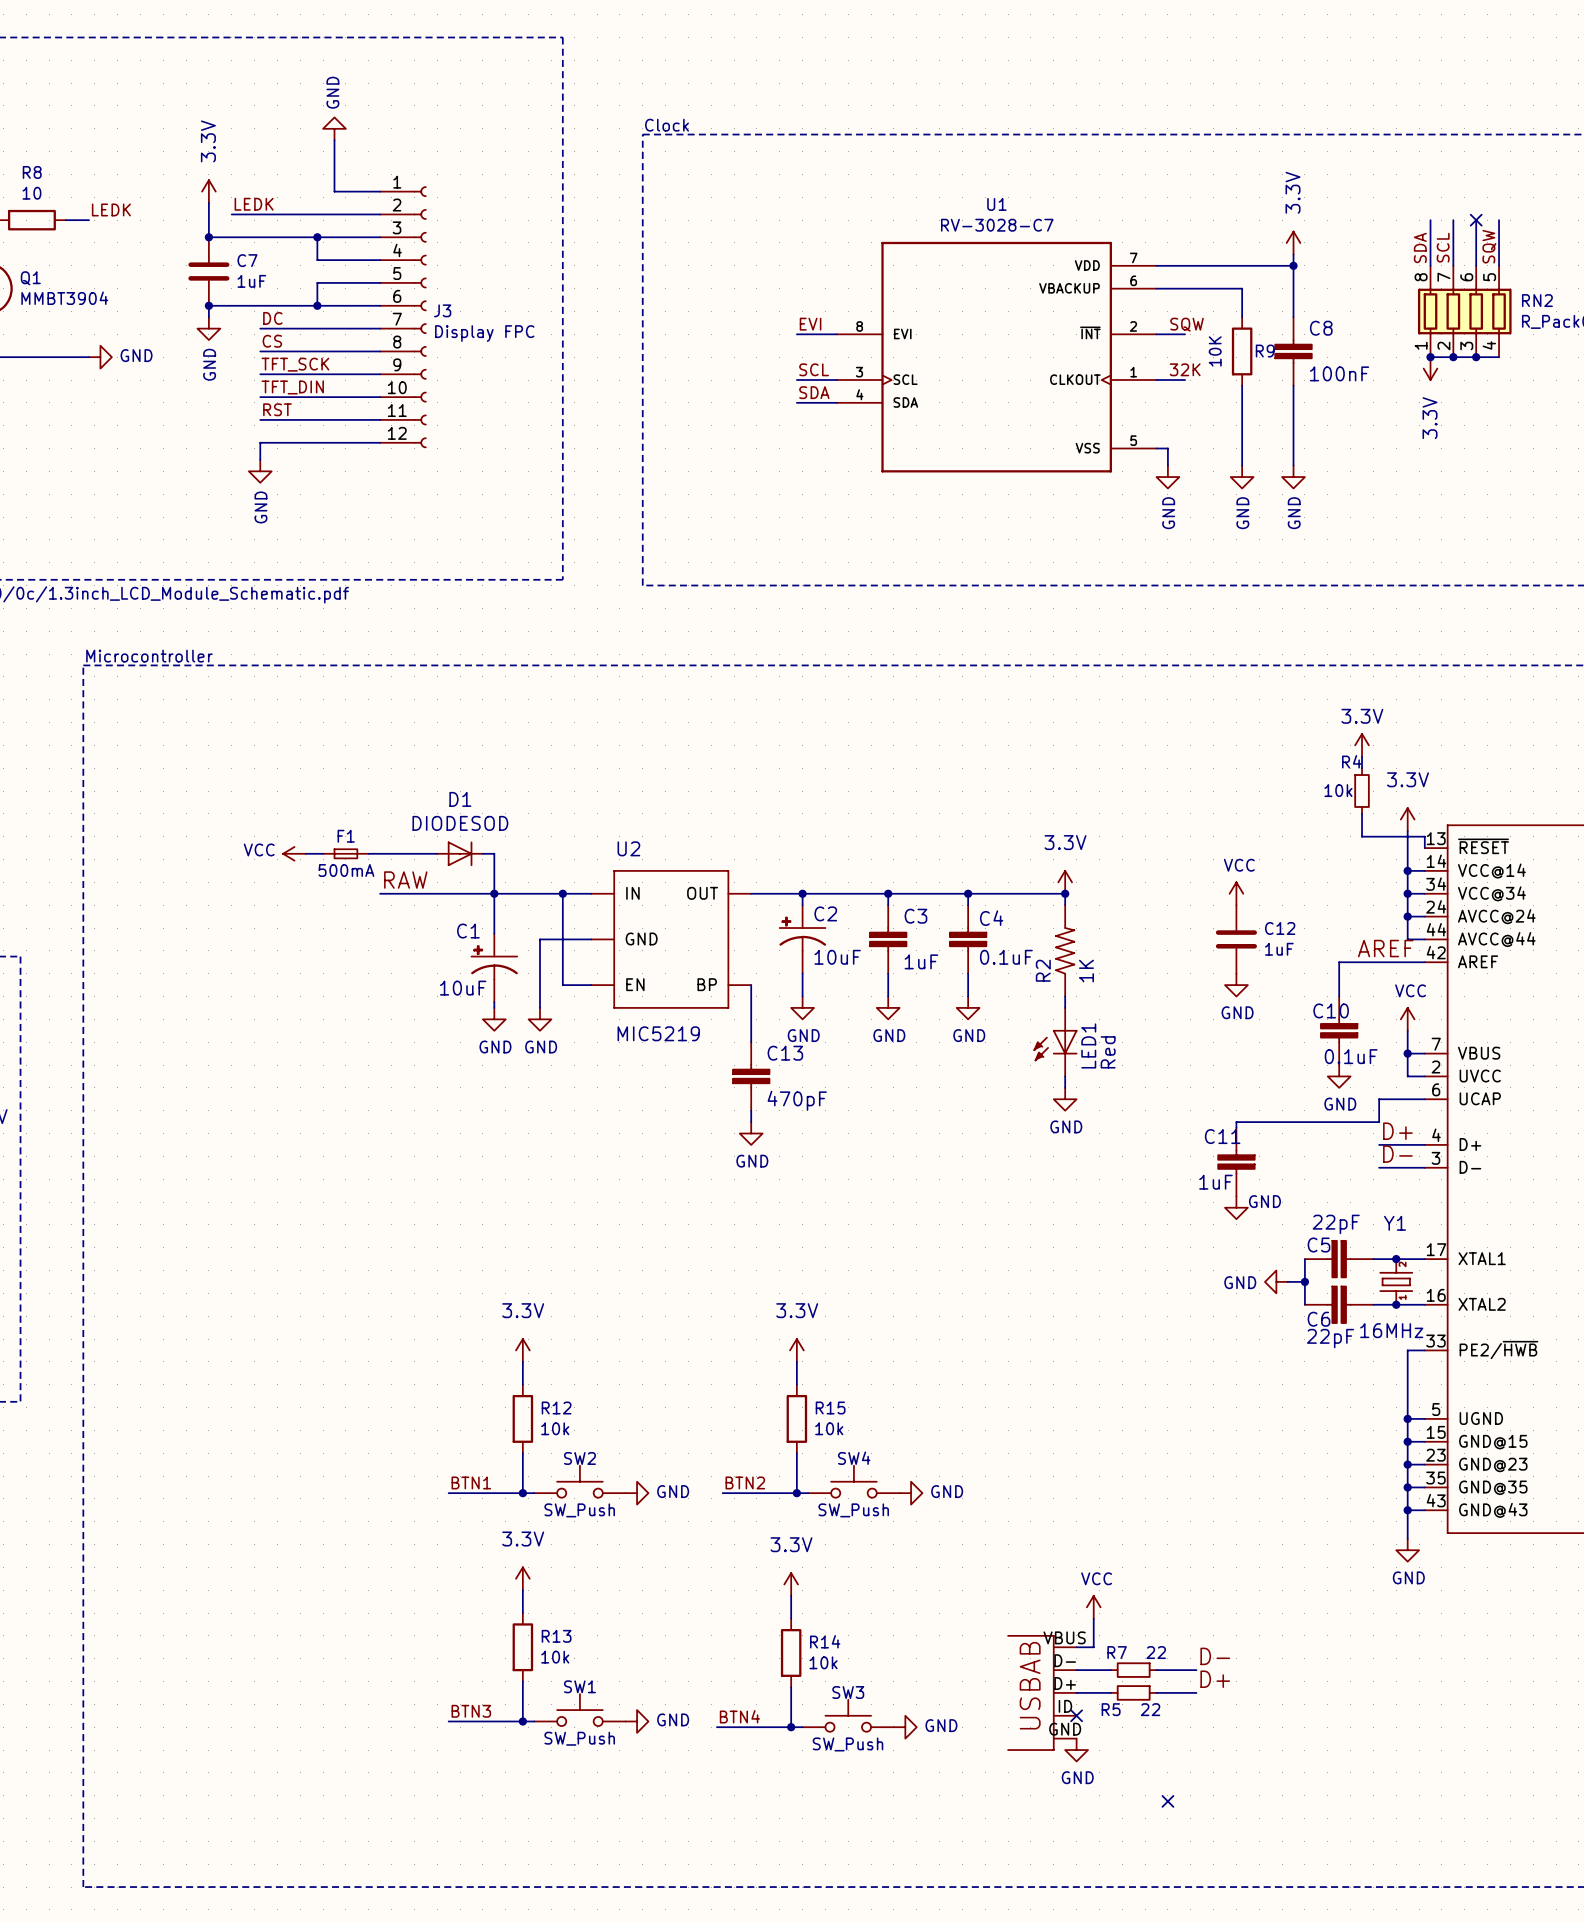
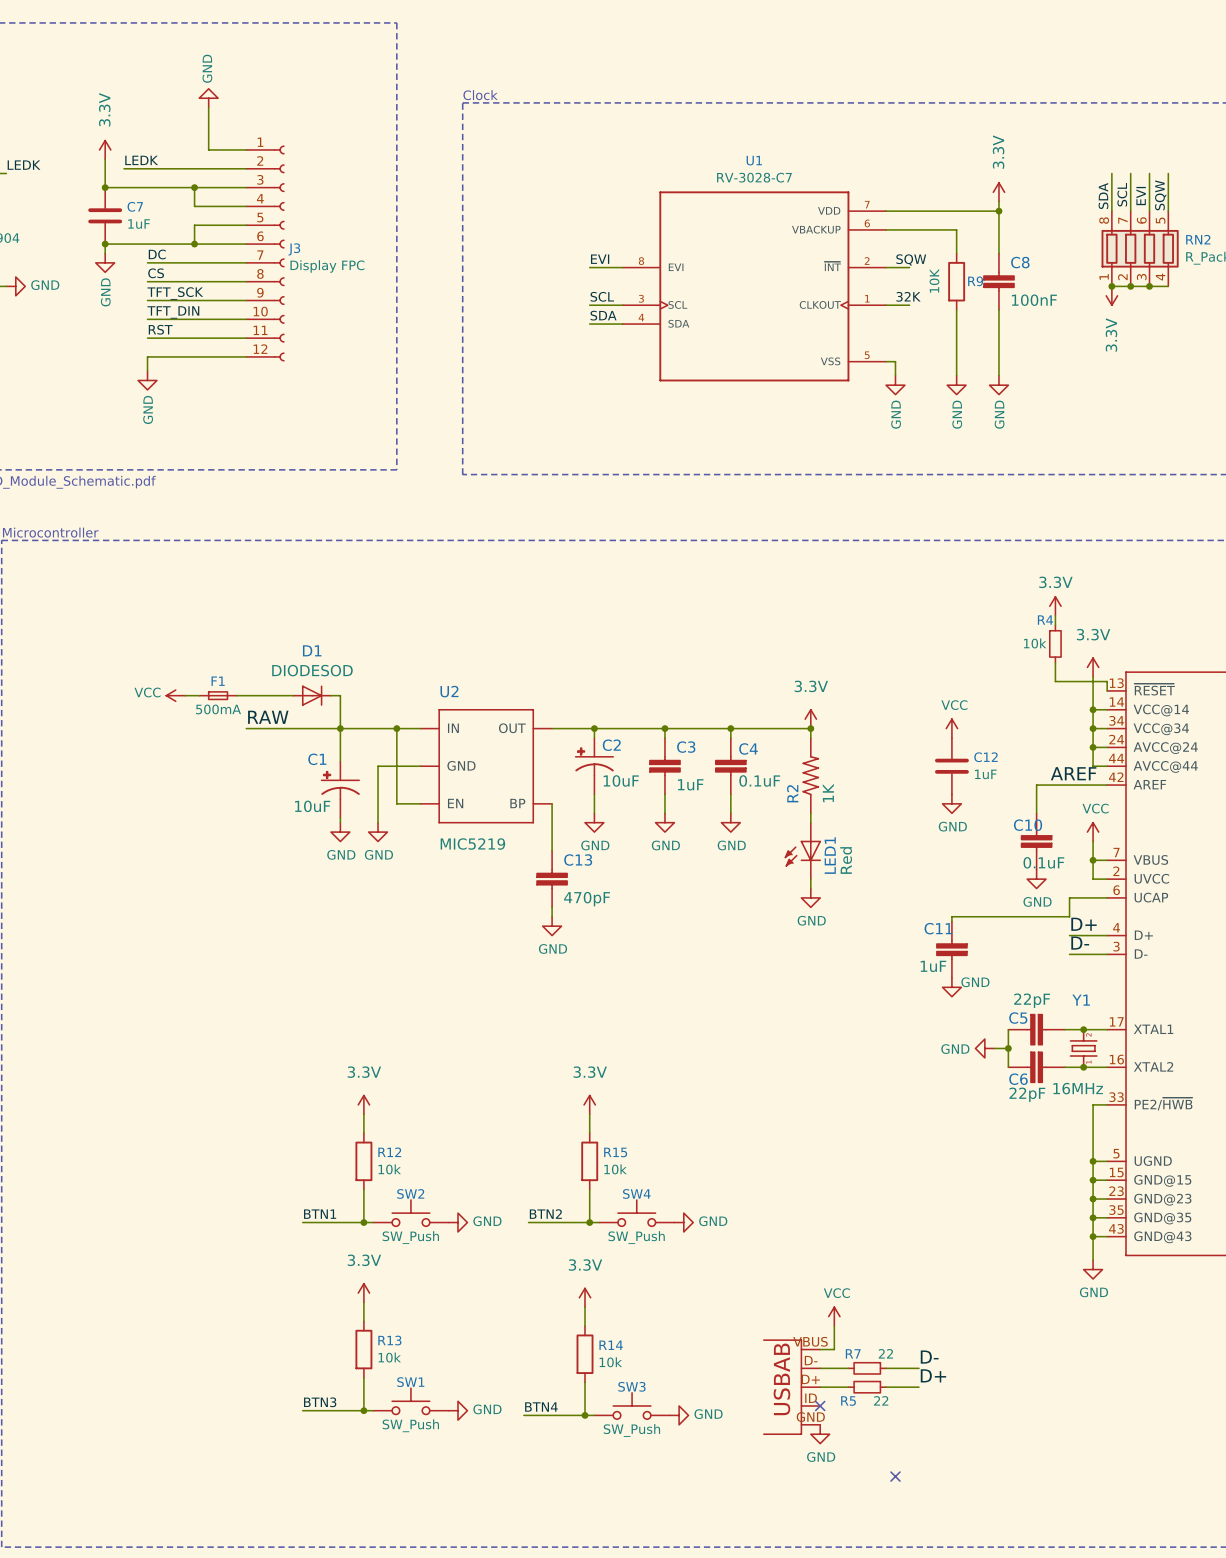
no-connect mark: (1476, 220) -> none
label: none -> EVI (1141, 196)

